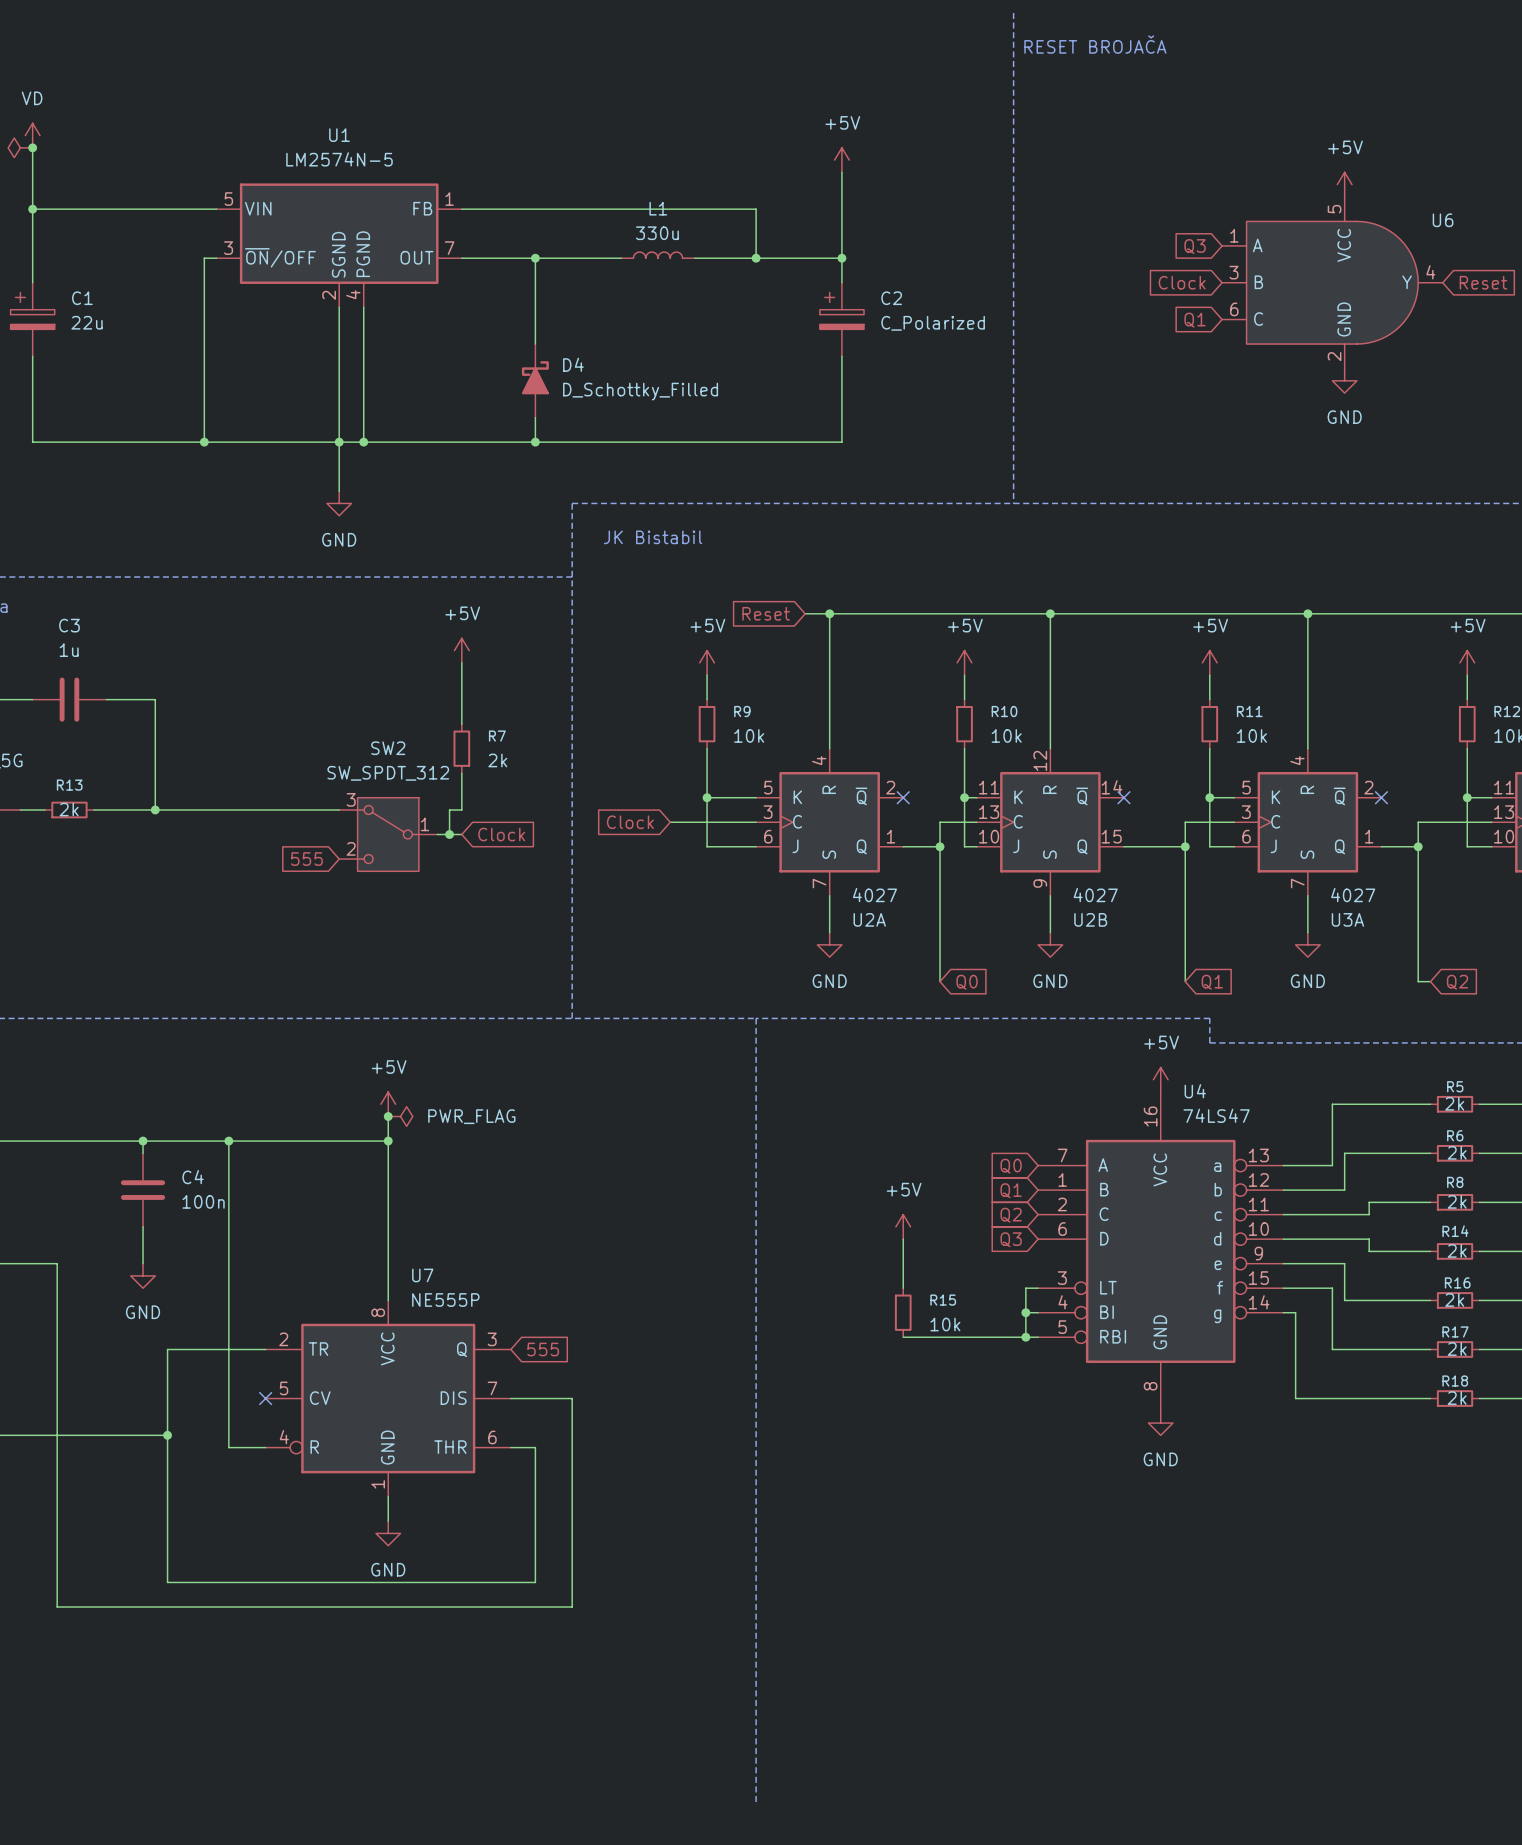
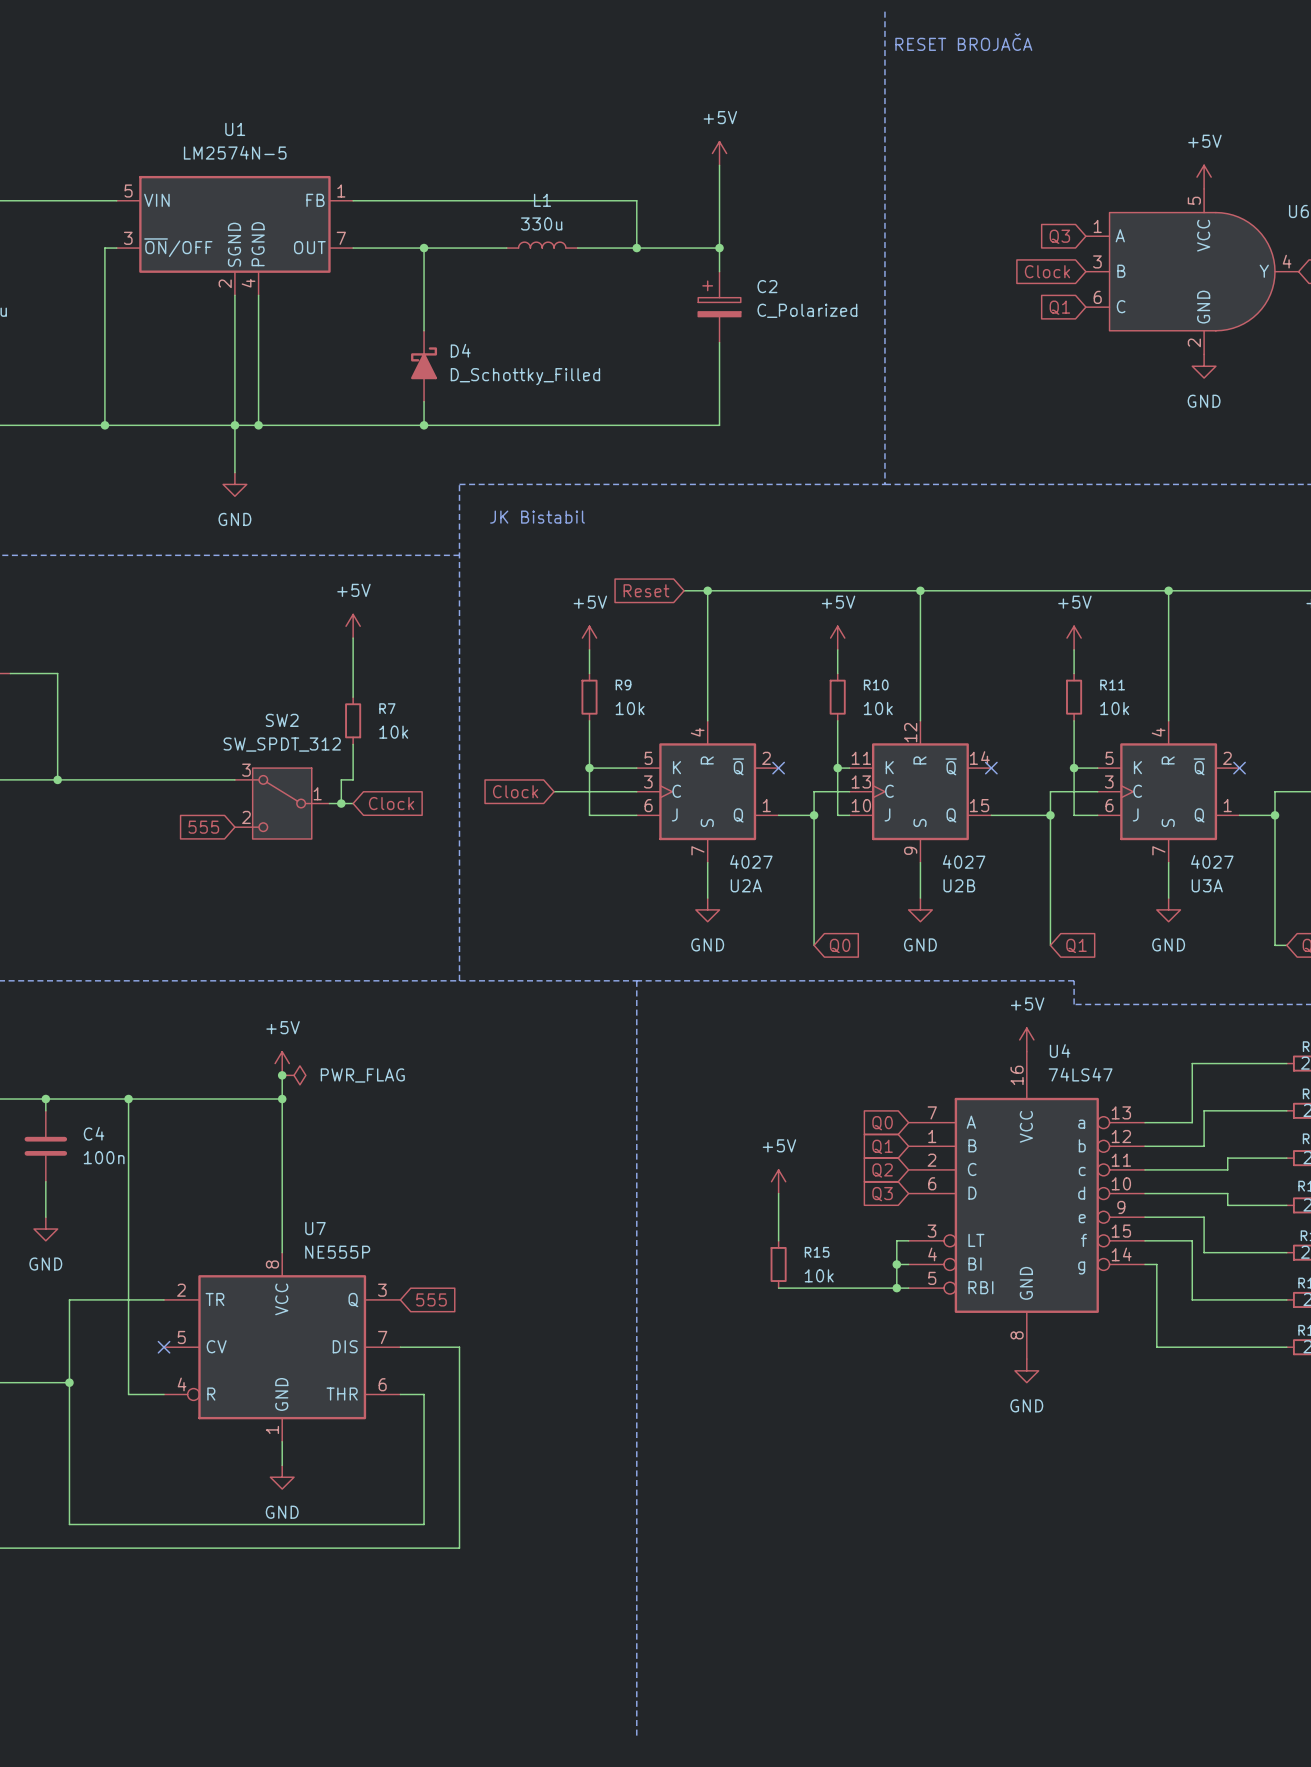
R7 value: 2k (497, 760) -> 10k (393, 732)

